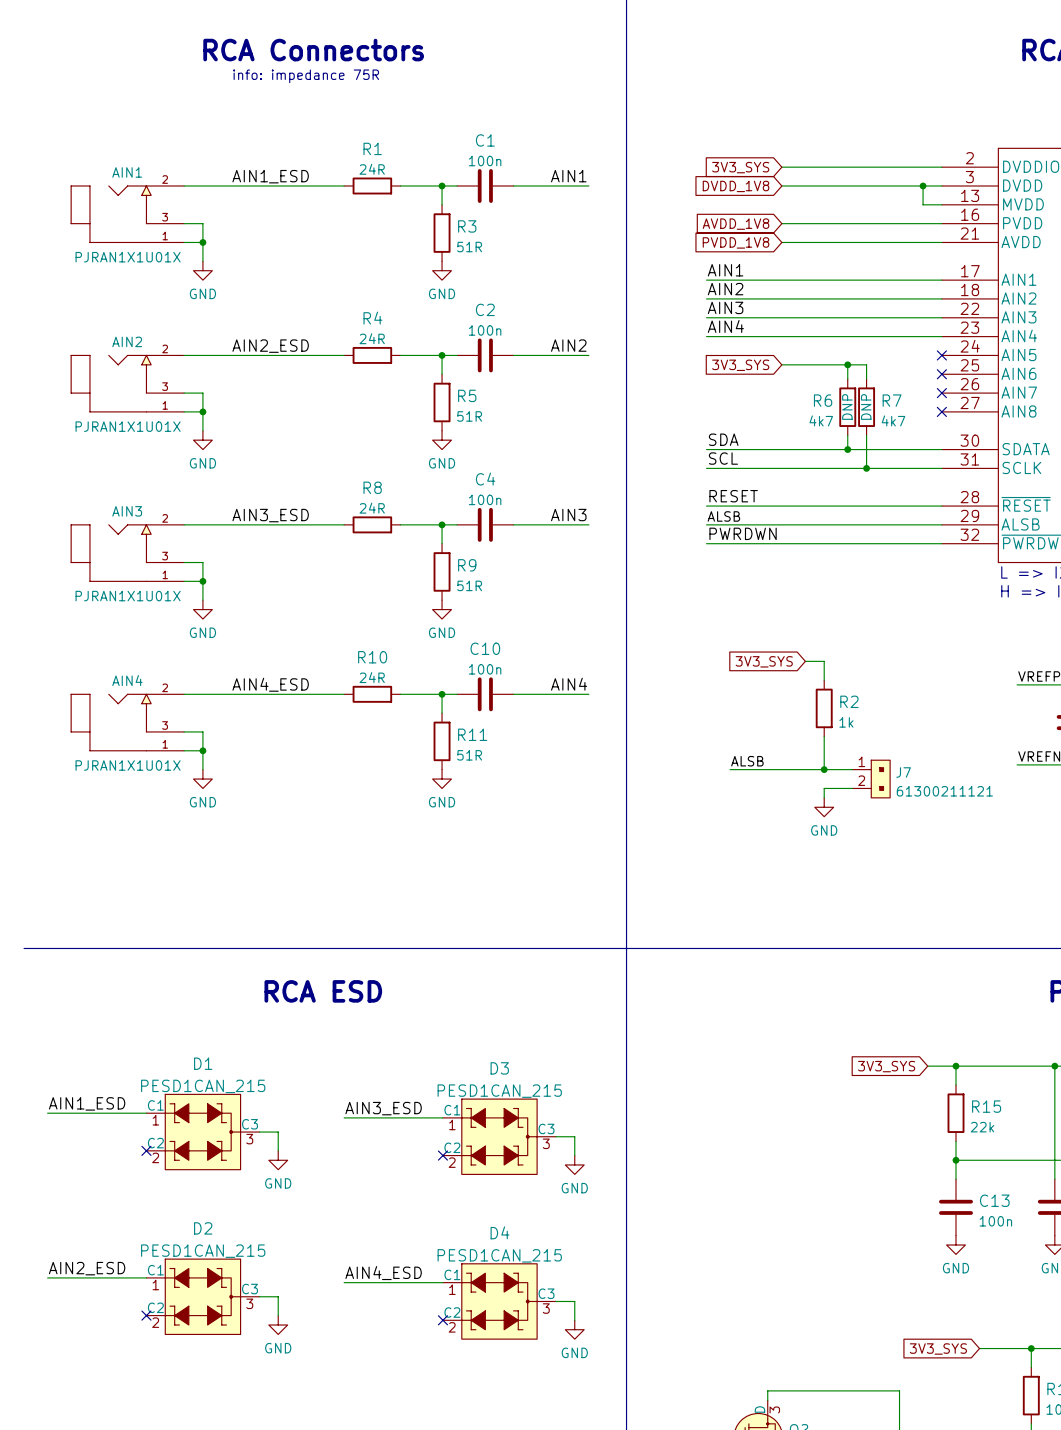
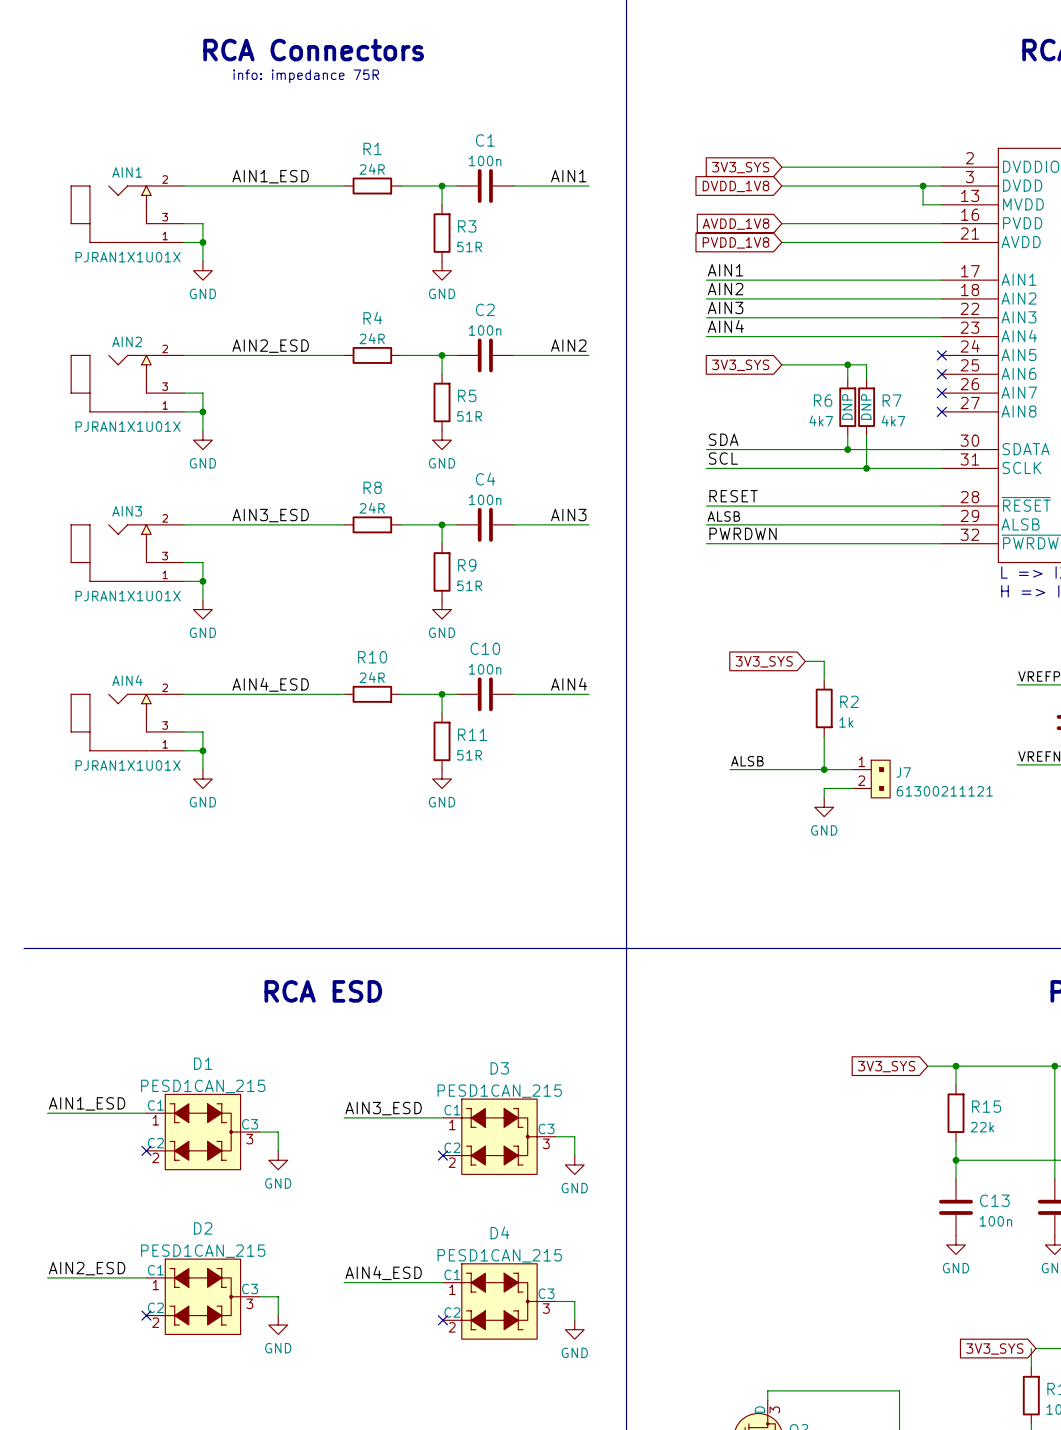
global label position: 3V3_SYS (938, 1348) -> 3V3_SYS (994, 1348)
wire: (979, 1348) (1036, 1348) -> none
junction: (1031, 1348) -> none

